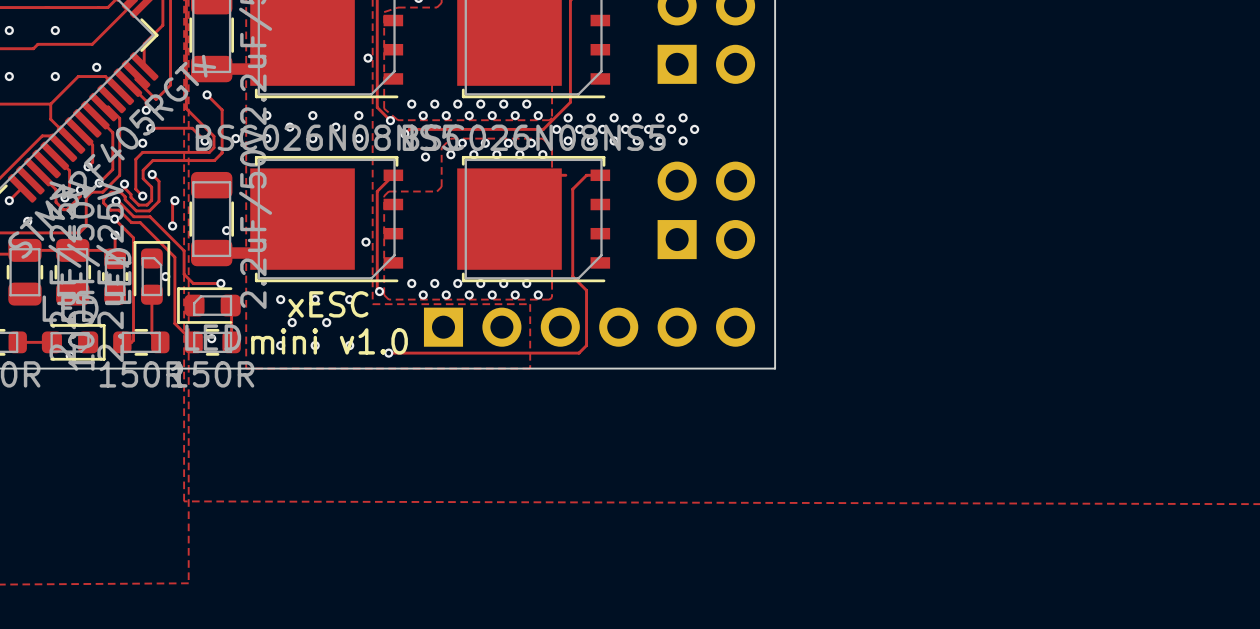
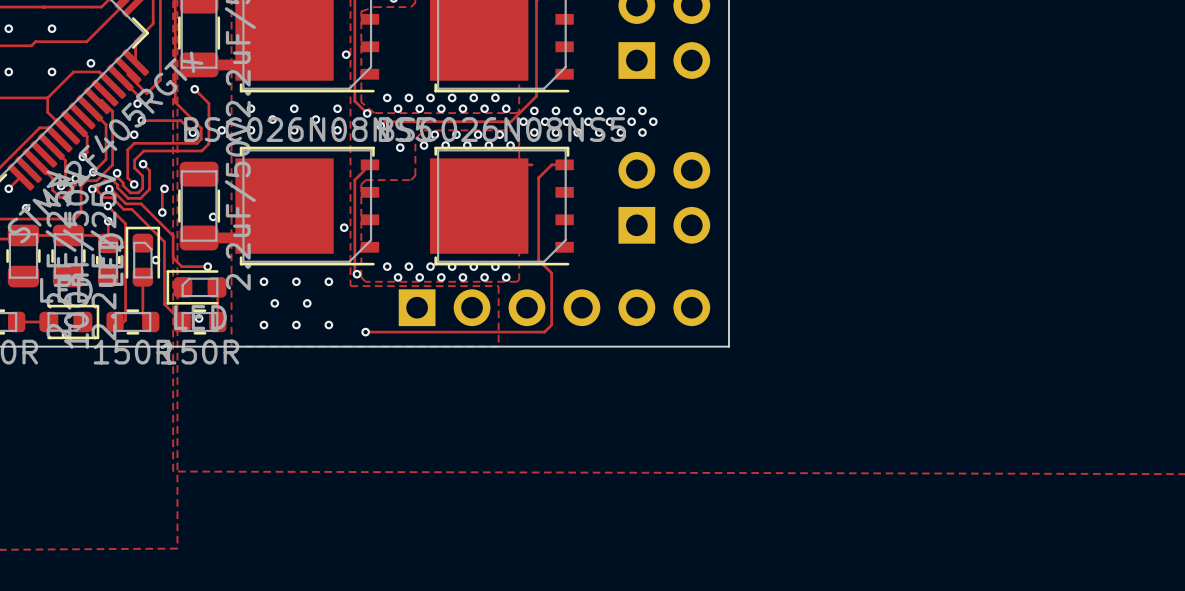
via: none -> (92, 189)
text: xESC (328, 304) -> none
text: mini v1.0 (329, 341) -> none

